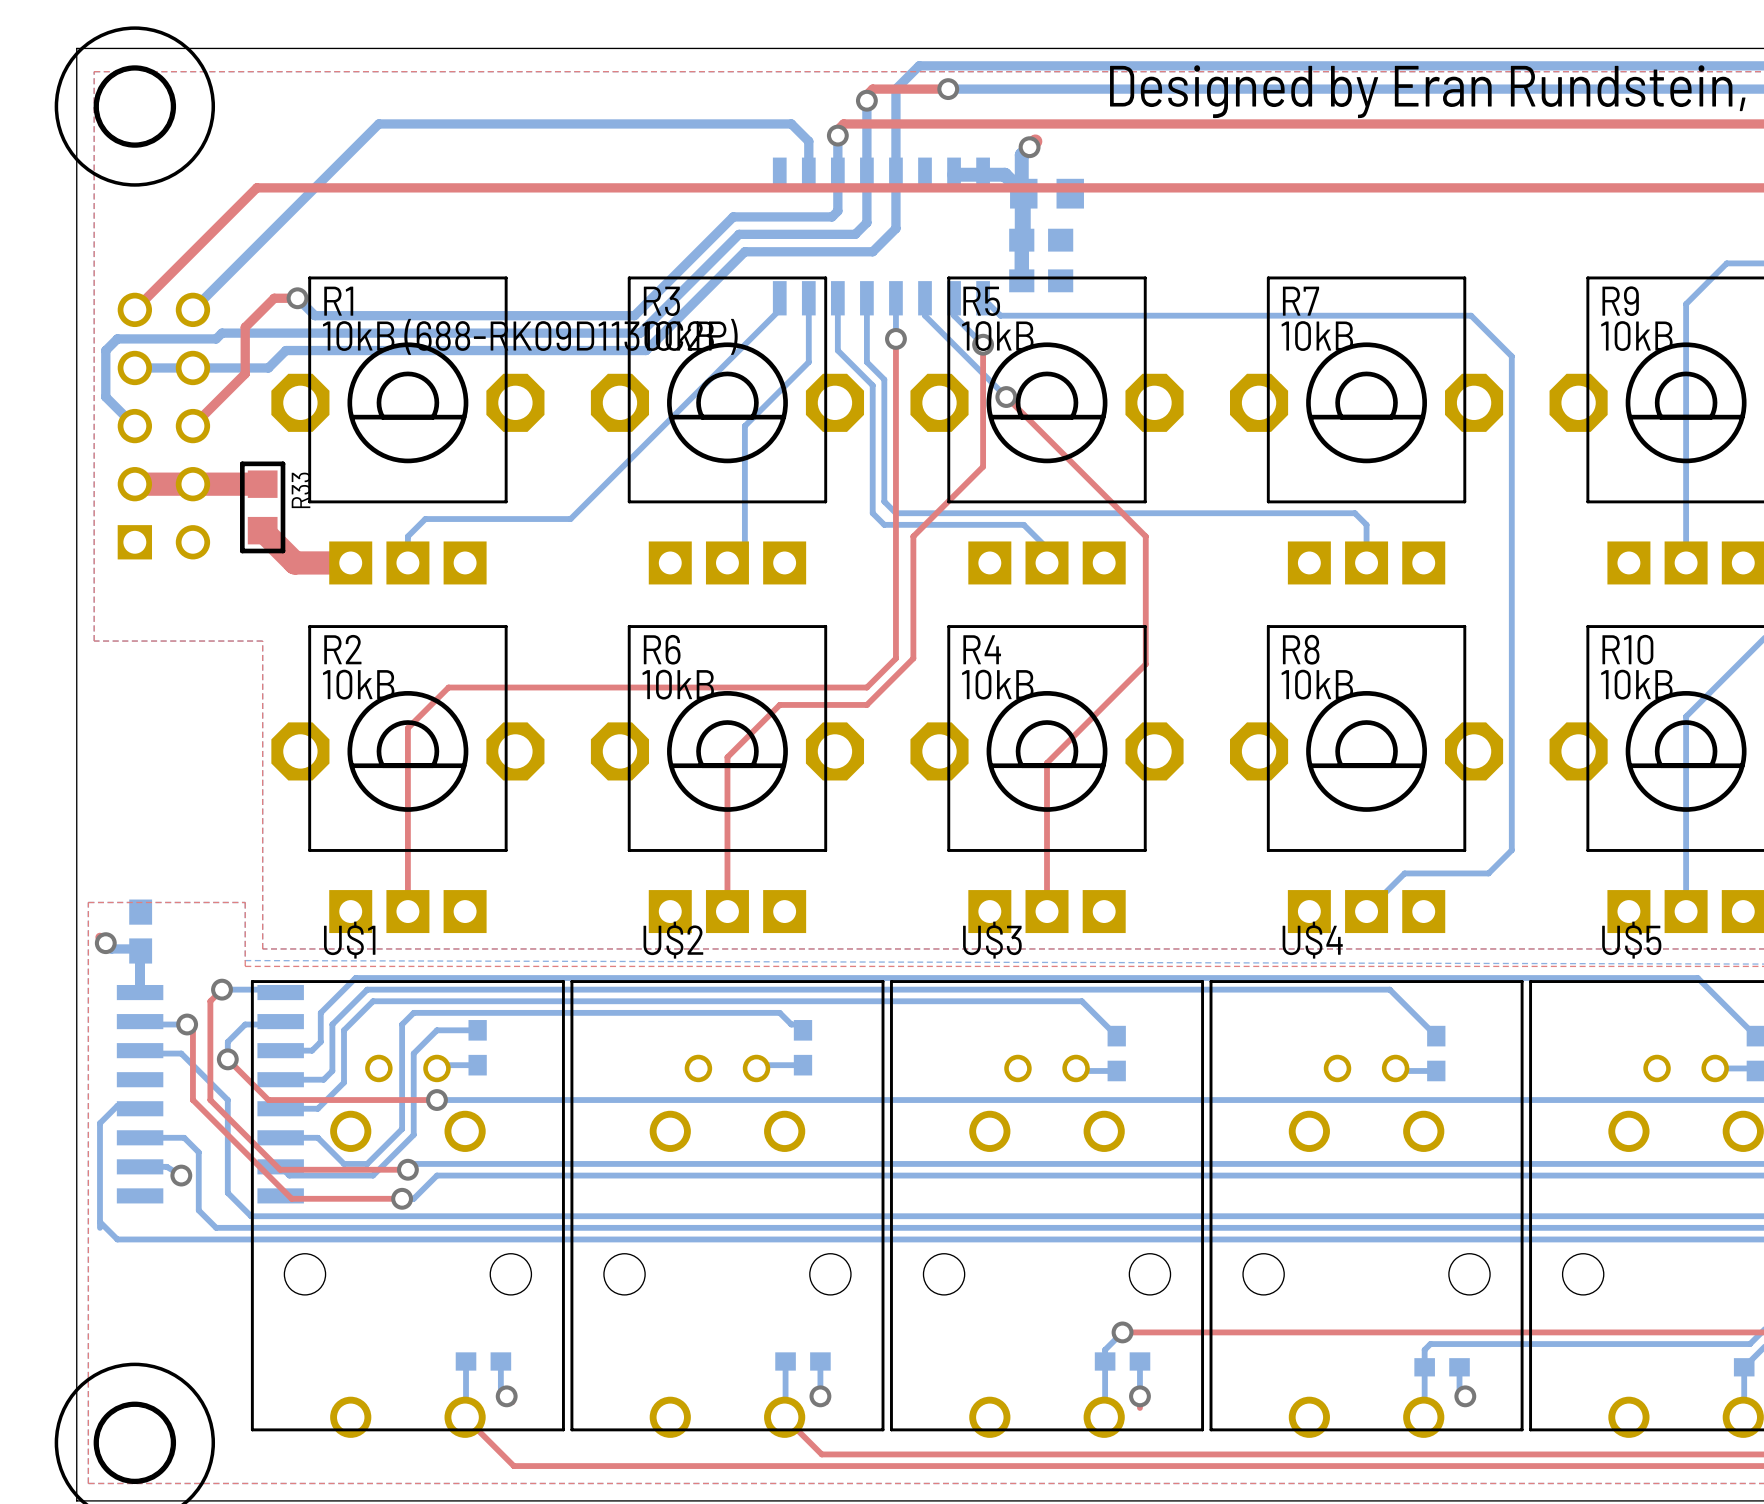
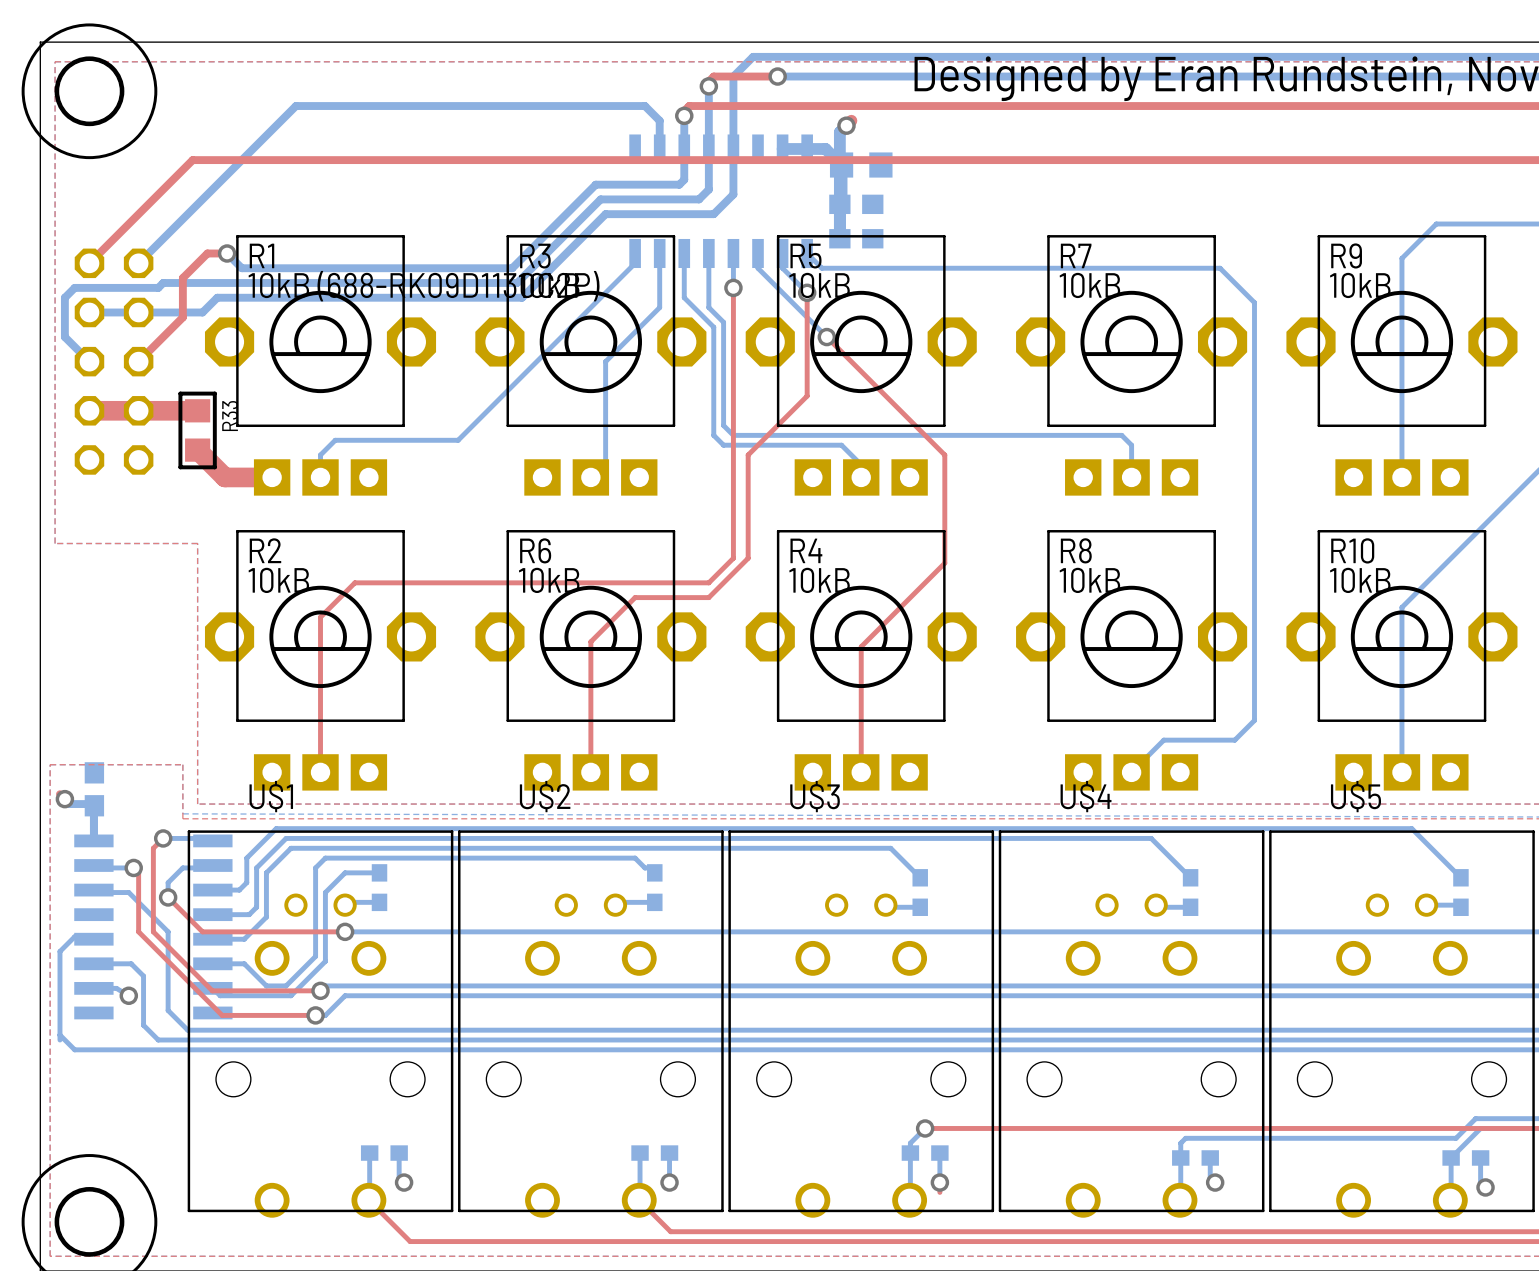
part footprint: [117, 292, 211, 560] -> [74, 248, 154, 475]

